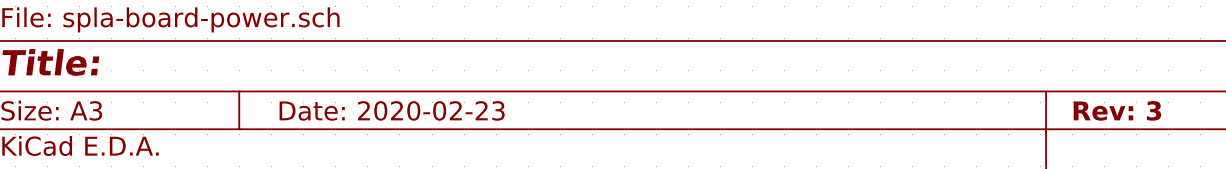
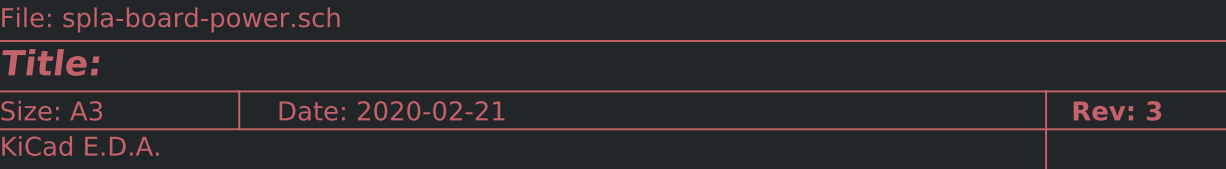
title block: Date: 2020-02-23 (392, 110) -> Date: 2020-02-21 (392, 110)

